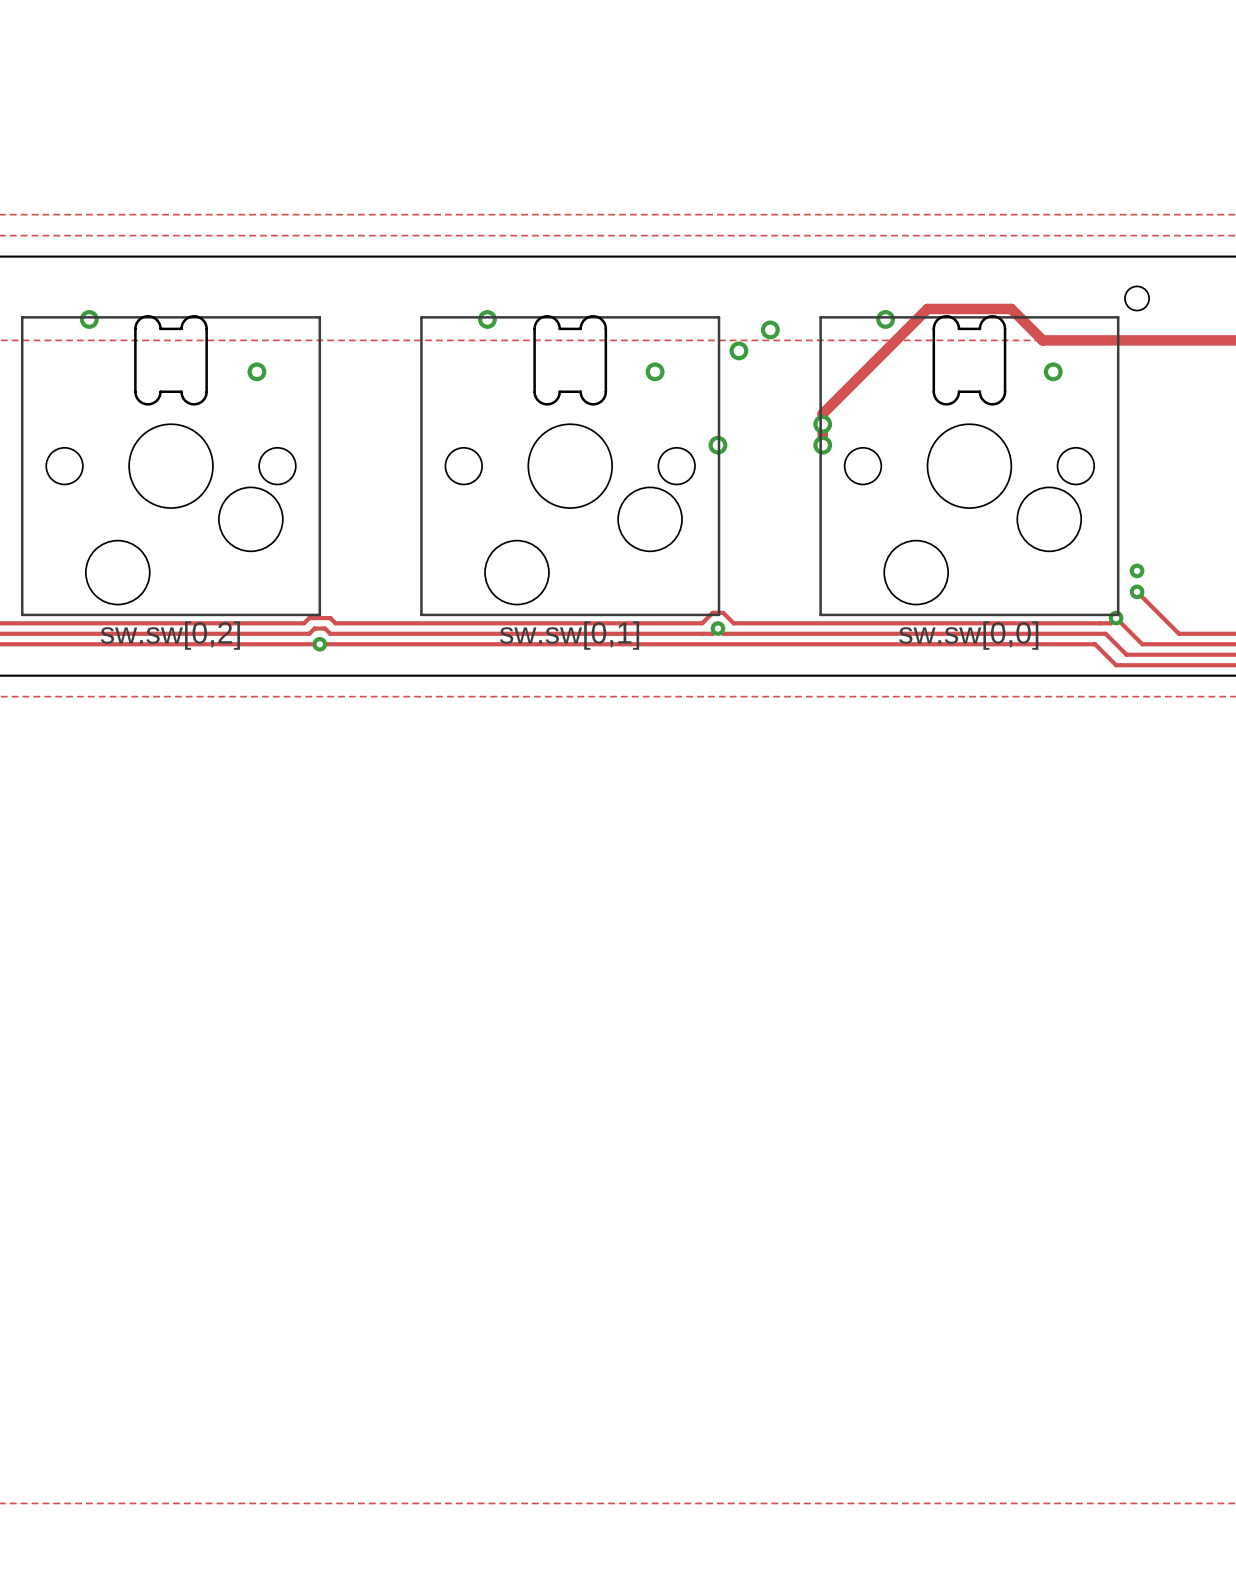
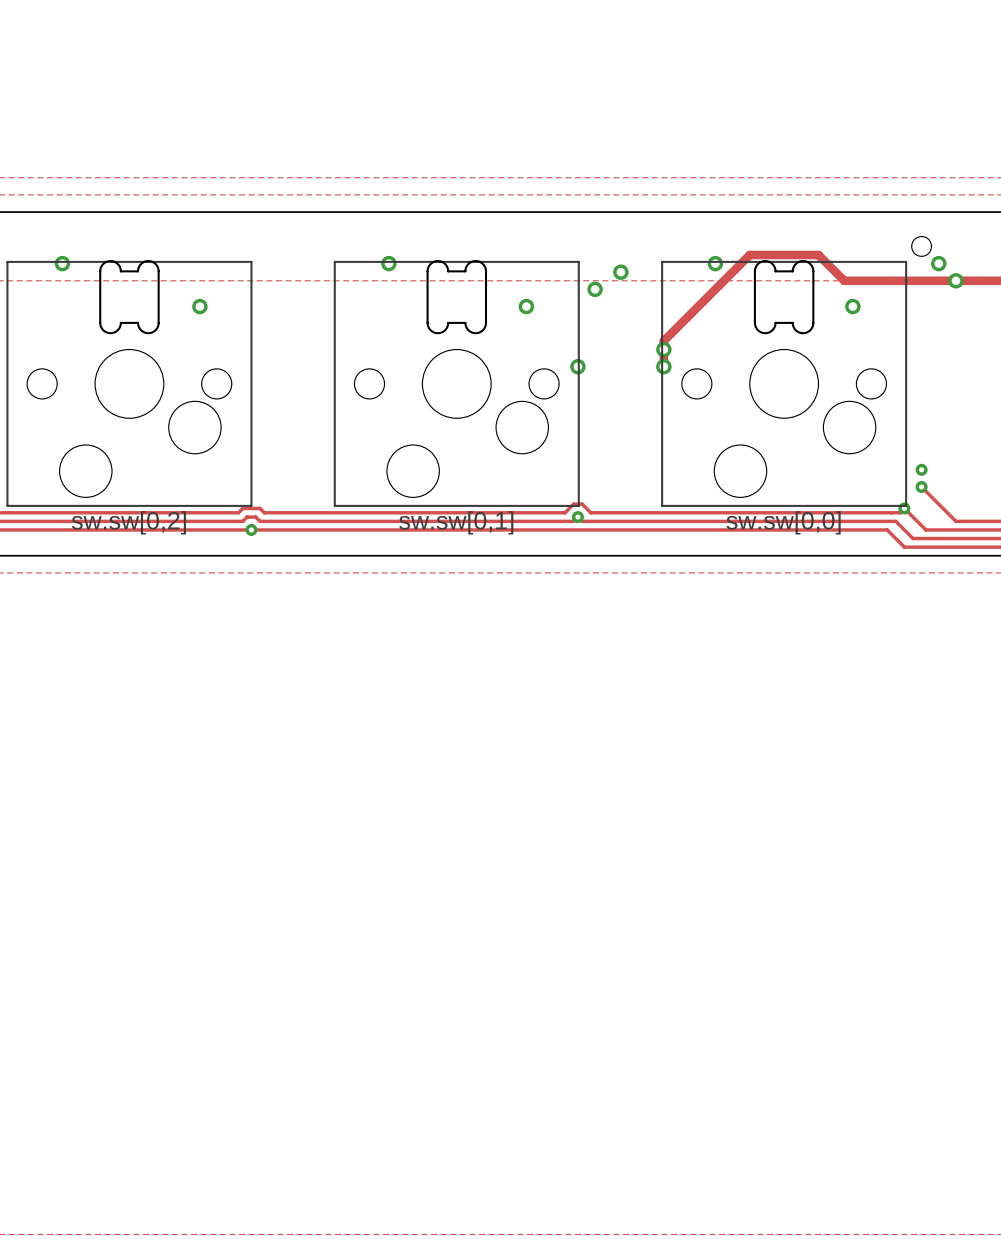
via: none -> (938, 263)
via: none -> (955, 280)

